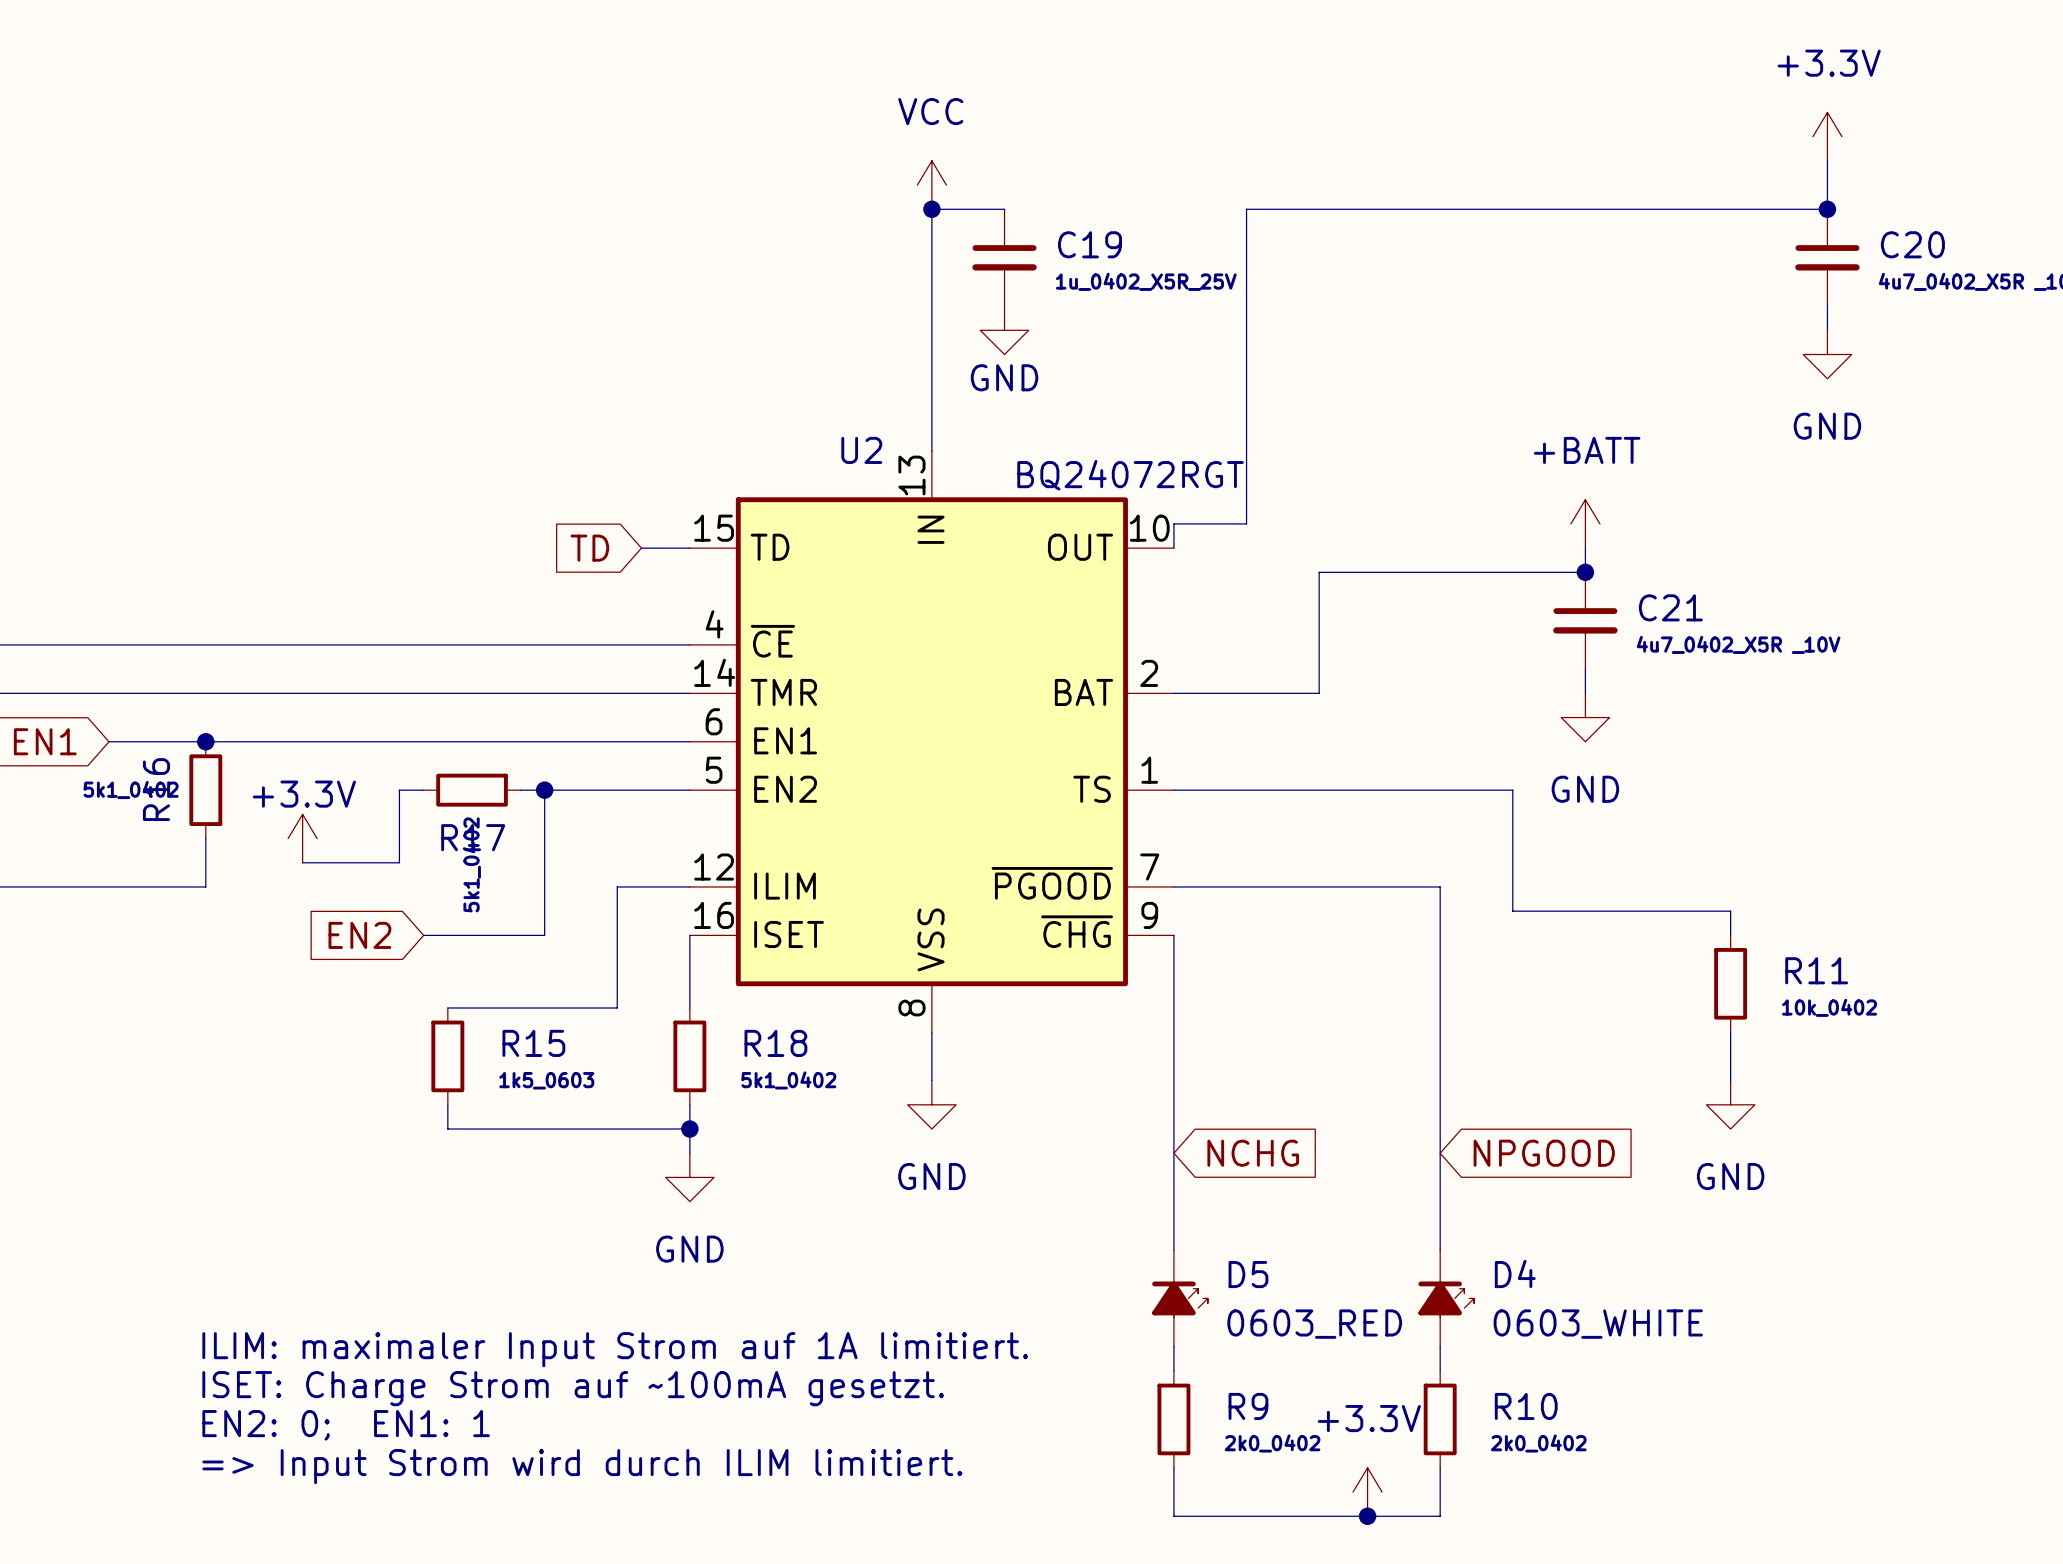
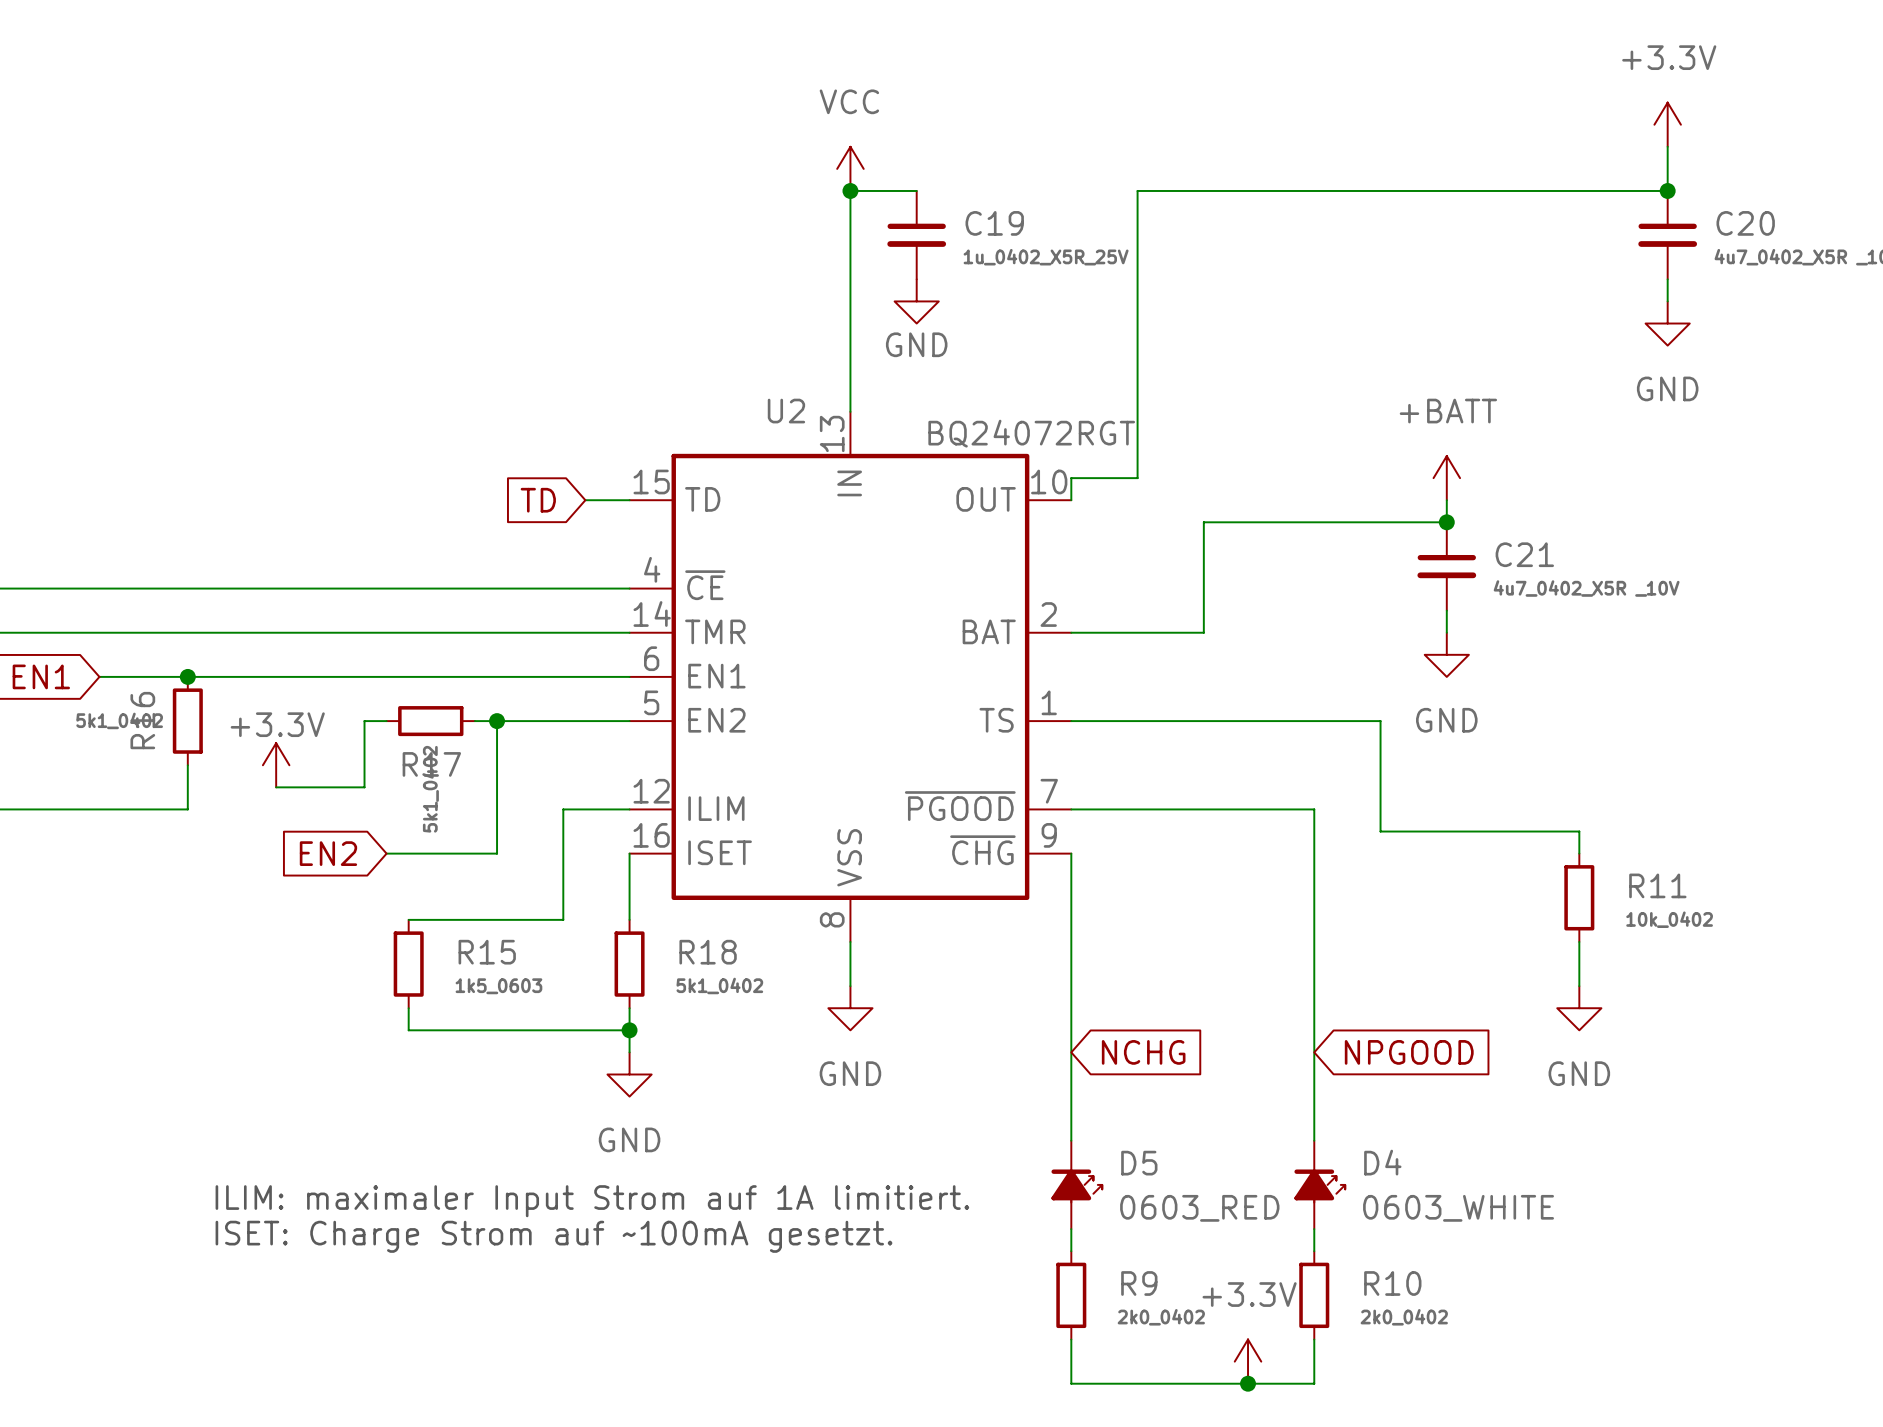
text position: ILIM: maximaler Input Strom auf 1A limitiert. (615, 1349) -> ILIM: maximaler Input Strom auf 1A limitiert. (592, 1201)
text position: ISET: Charge Strom auf ~100mA gesetzt. (573, 1388) -> ISET: Charge Strom auf ~100mA gesetzt. (554, 1236)
text: EN2: 0; EN1: 1 (346, 1425) -> none
text: => Input Strom wird durch ILIM limitiert. (582, 1466) -> none

